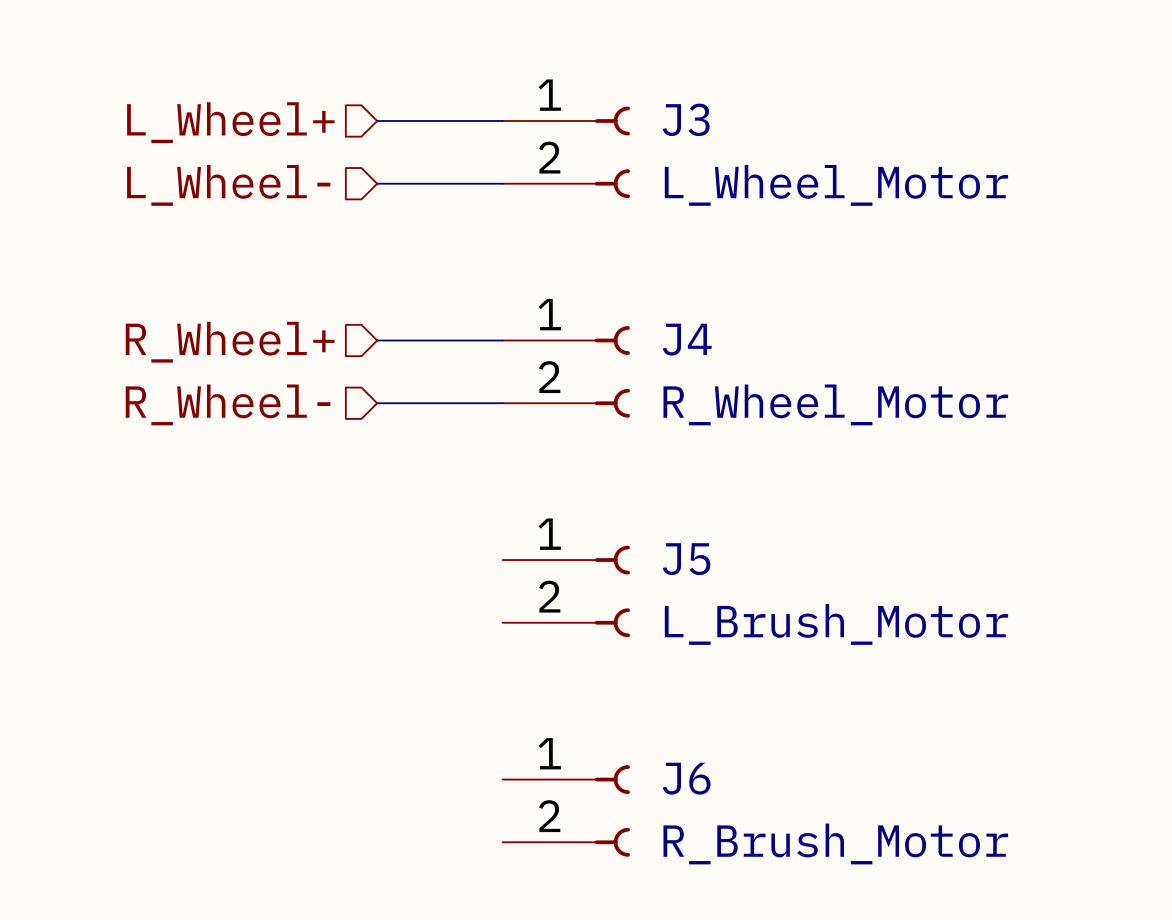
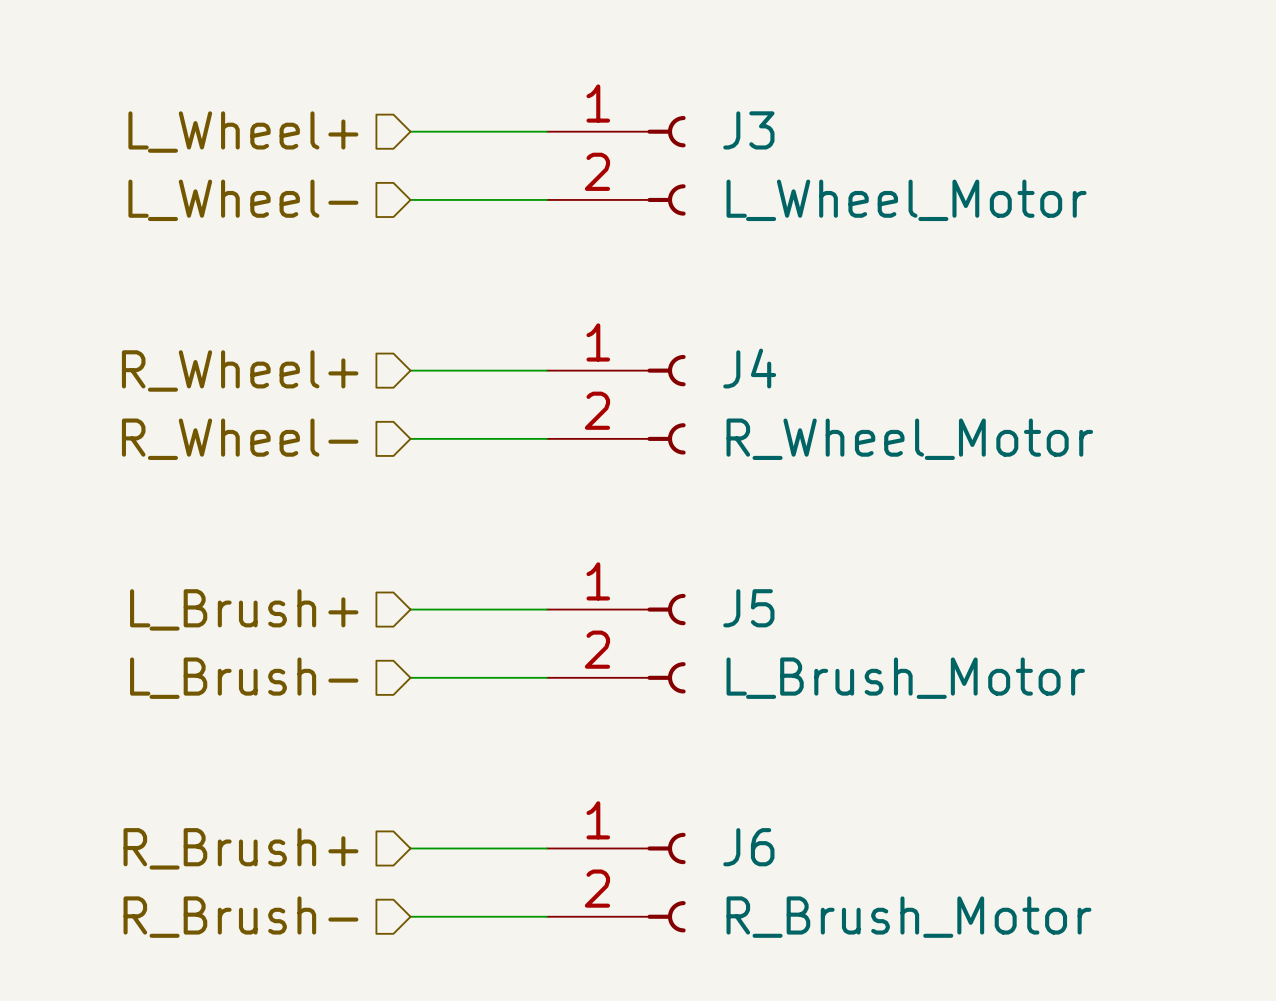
wire: none -> (410, 609) (547, 609)
hierarchical label: none -> L_Brush+ (244, 609)
wire: none -> (410, 677) (547, 677)
hierarchical label: none -> L_Brush- (244, 678)
wire: none -> (410, 848) (547, 848)
hierarchical label: none -> R_Brush+ (240, 848)
wire: none -> (410, 916) (547, 916)
hierarchical label: none -> R_Brush- (240, 917)

